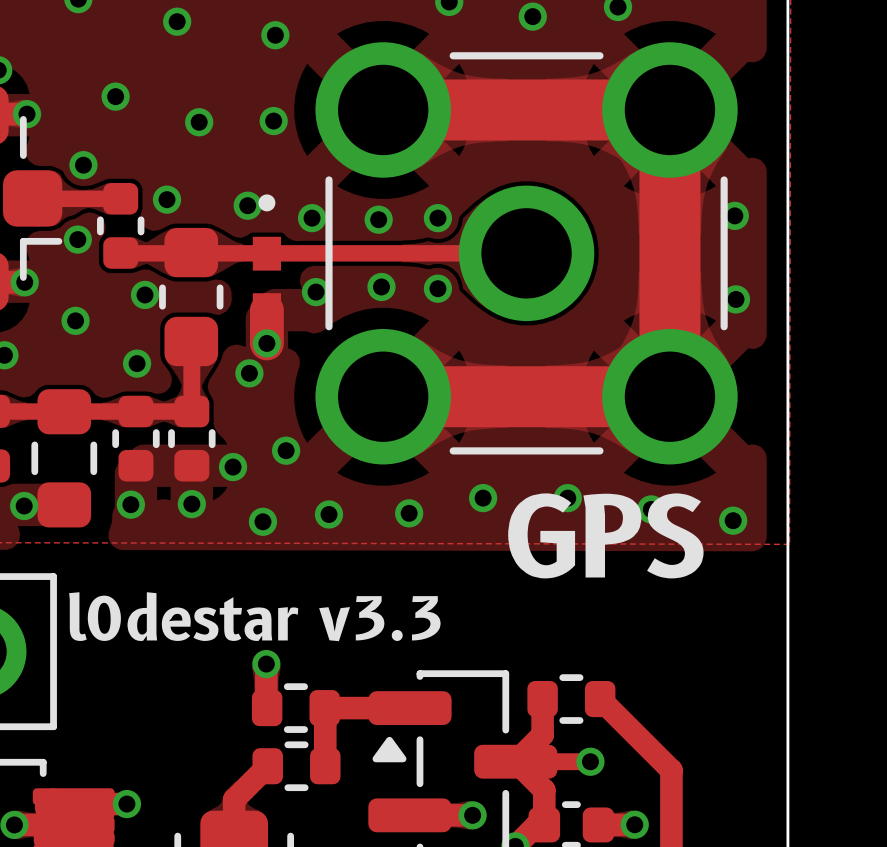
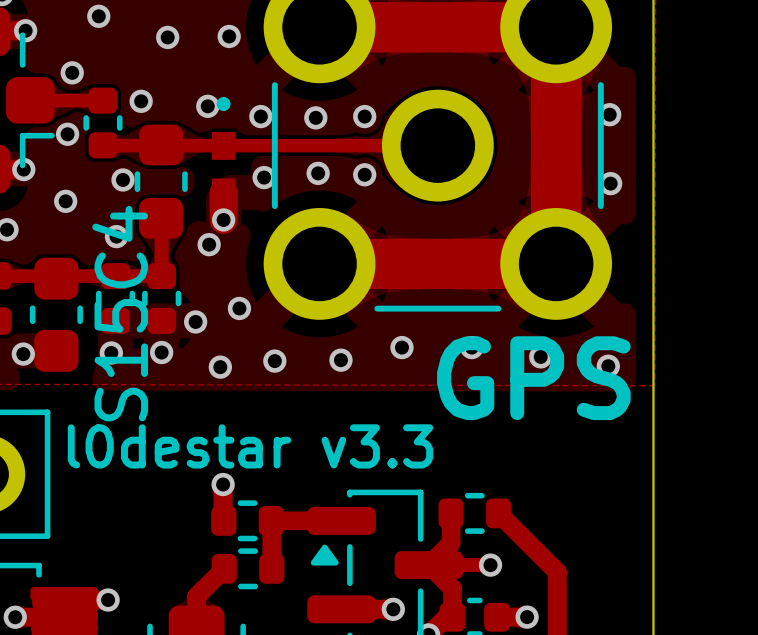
part: (64, 458) -> none
S15C4: none -> (56, 314)

